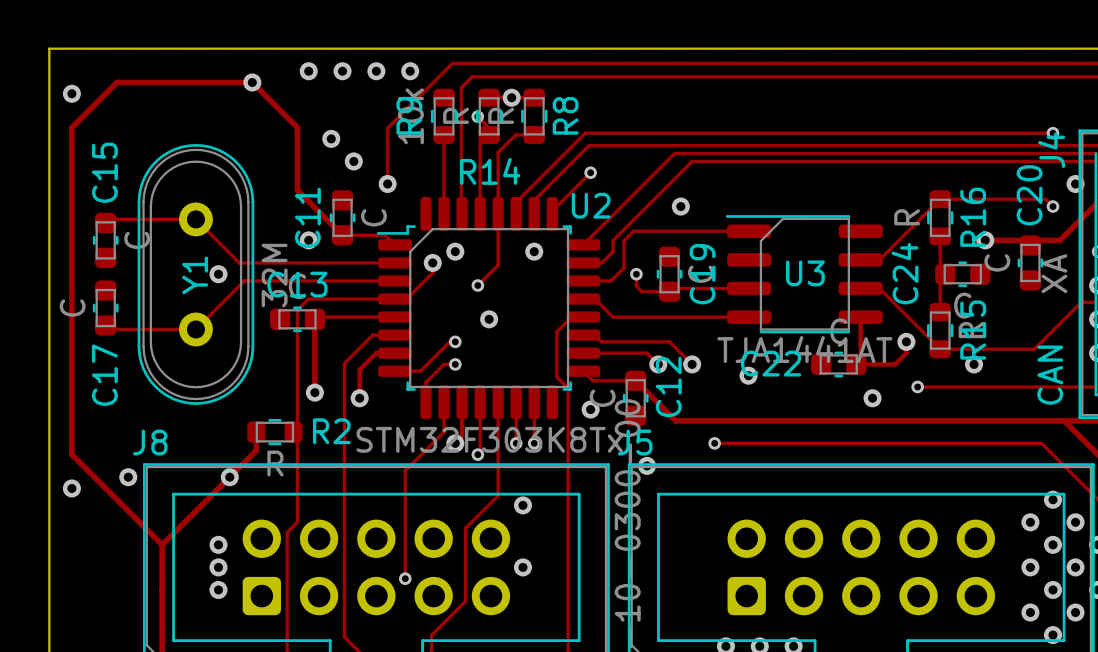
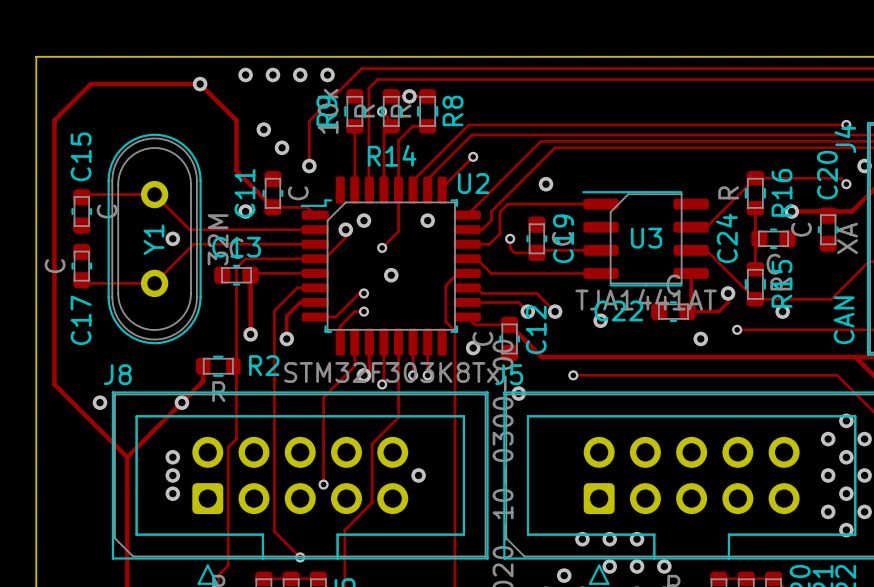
via: (71, 93) -> none
via: (71, 488) -> none
via: (522, 505) -> none

